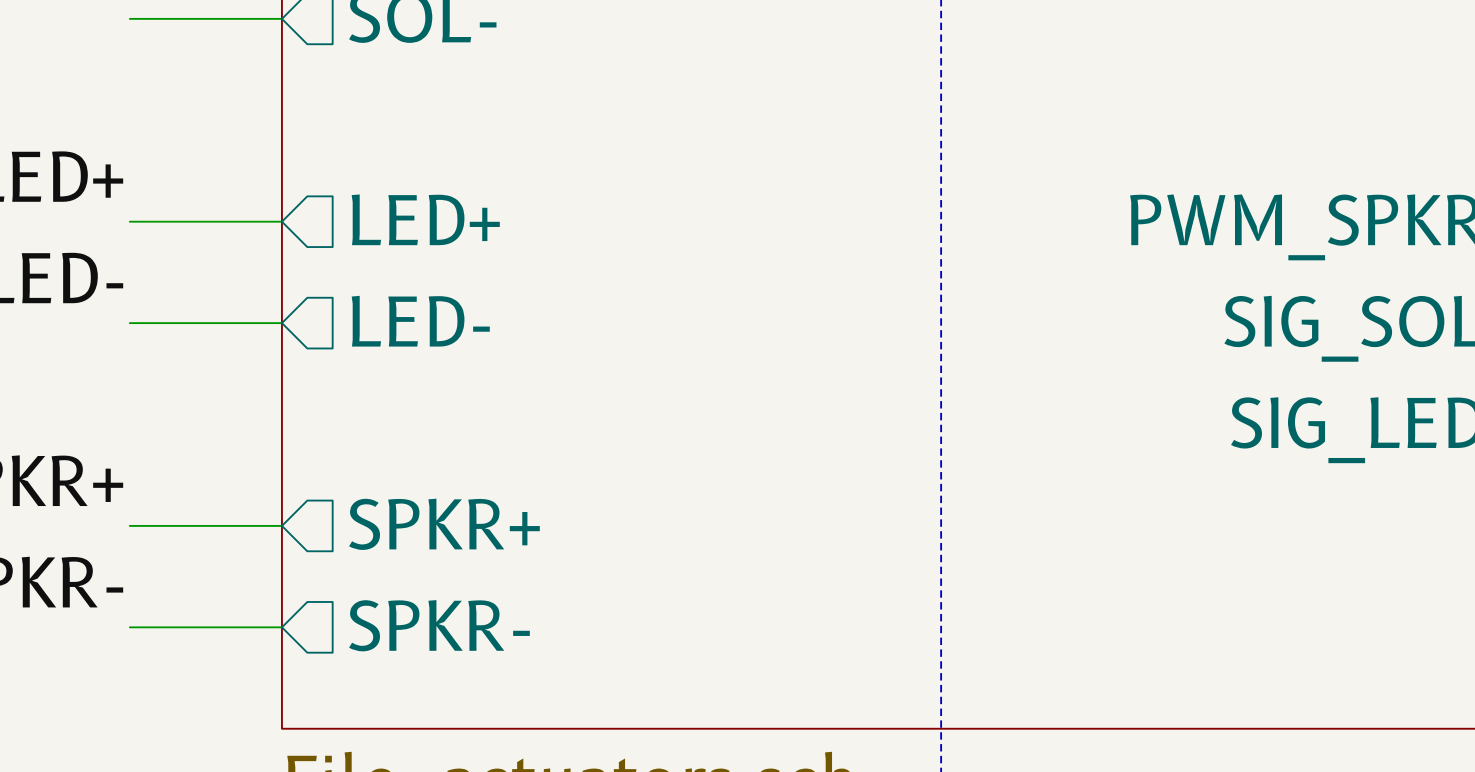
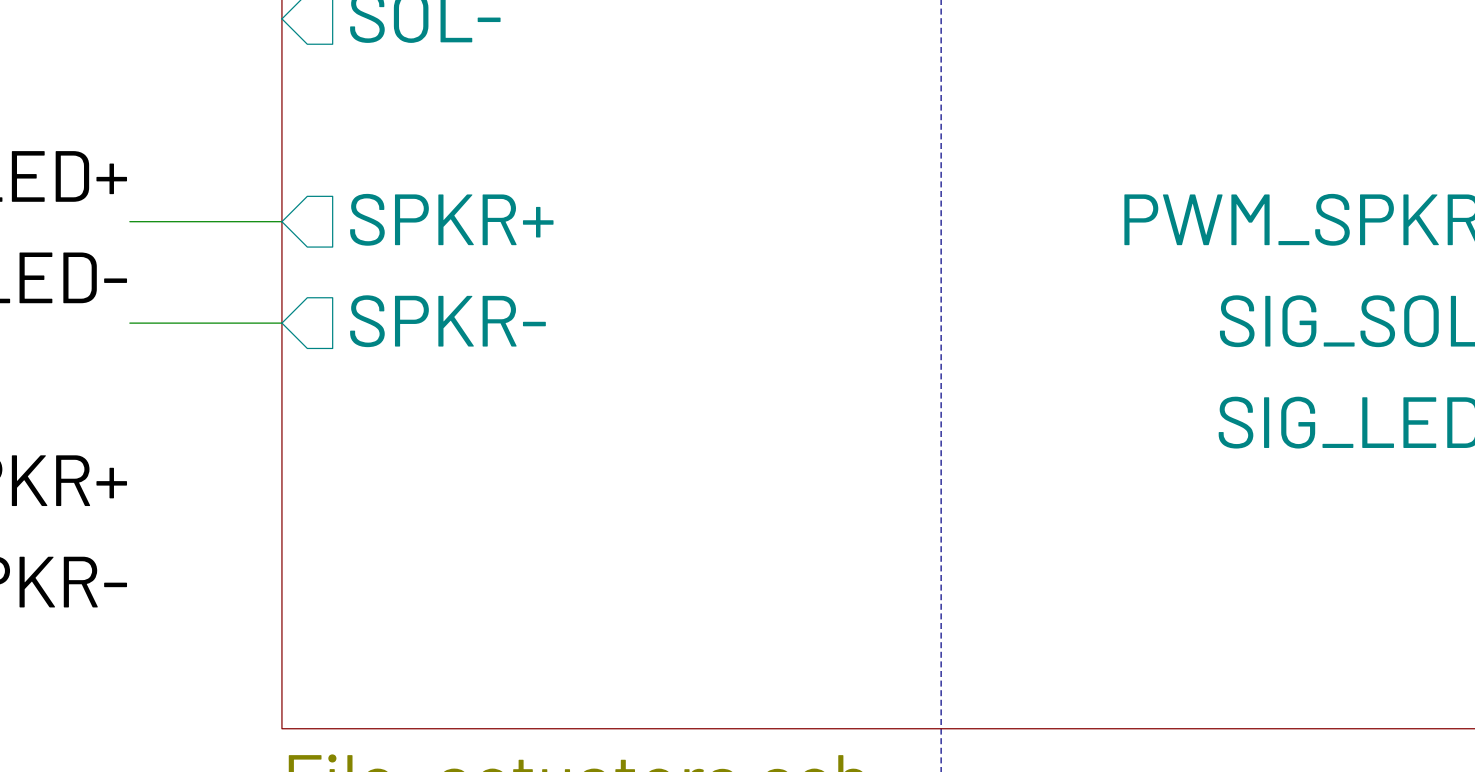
wire: (129, 18) (281, 18) -> none
sheet pin: LED+ (425, 219) -> SPKR+ (451, 219)
sheet pin: LED- (420, 321) -> SPKR- (447, 321)
sheet pin: SPKR+ (444, 524) -> none
wire: (129, 525) (281, 525) -> none
sheet pin: SPKR- (439, 625) -> none
wire: (129, 627) (281, 627) -> none

